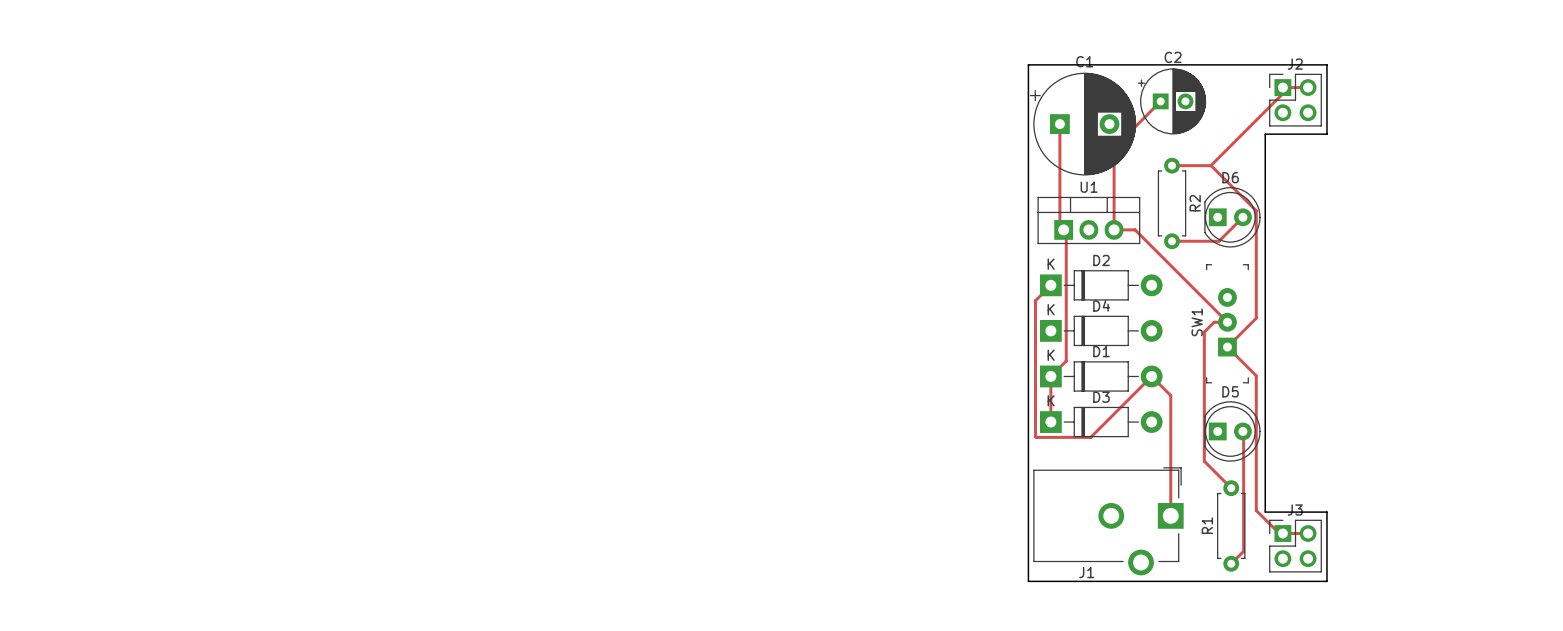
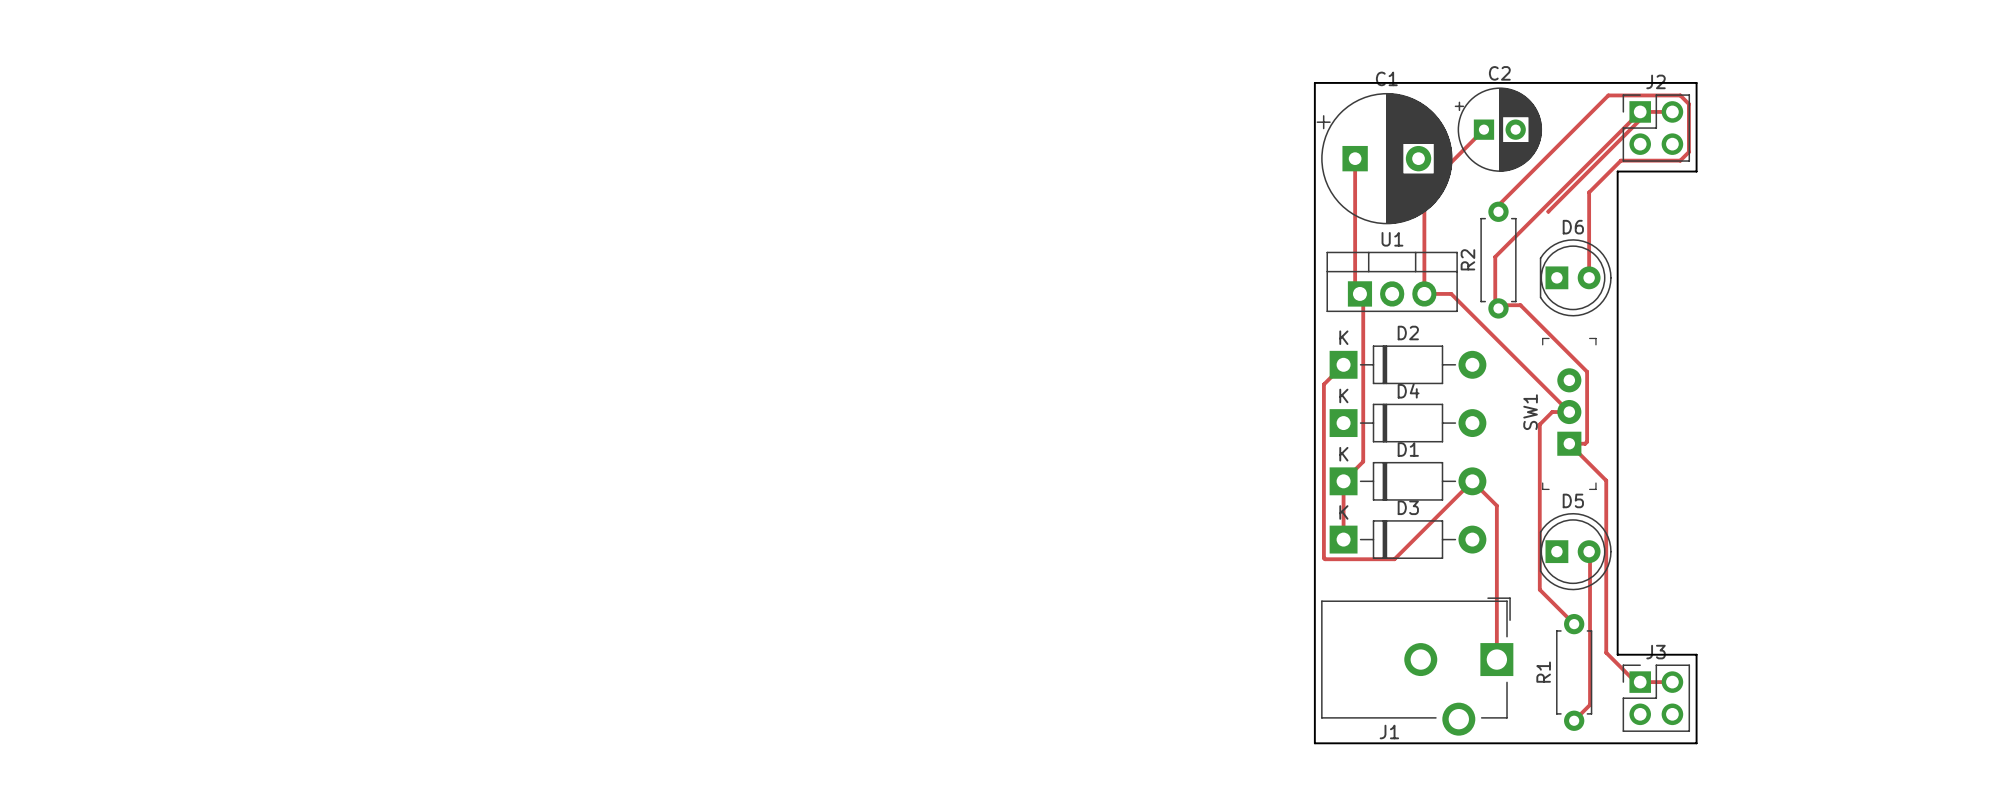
track: (1172, 165) (1211, 165) (1256, 210) (1256, 318) (1227, 347) -> (1640, 111) (1495, 256) (1495, 305) (1520, 305) (1587, 371) (1587, 441) (1585, 443) (1569, 443)
R2 name position: R2 (1195, 203) -> R2 (1467, 259)
track: (1242, 217) (1219, 241) (1172, 241) -> (1589, 277) (1589, 192) (1620, 160) (1680, 160) (1688, 152) (1688, 104) (1680, 95) (1608, 95) (1495, 208)

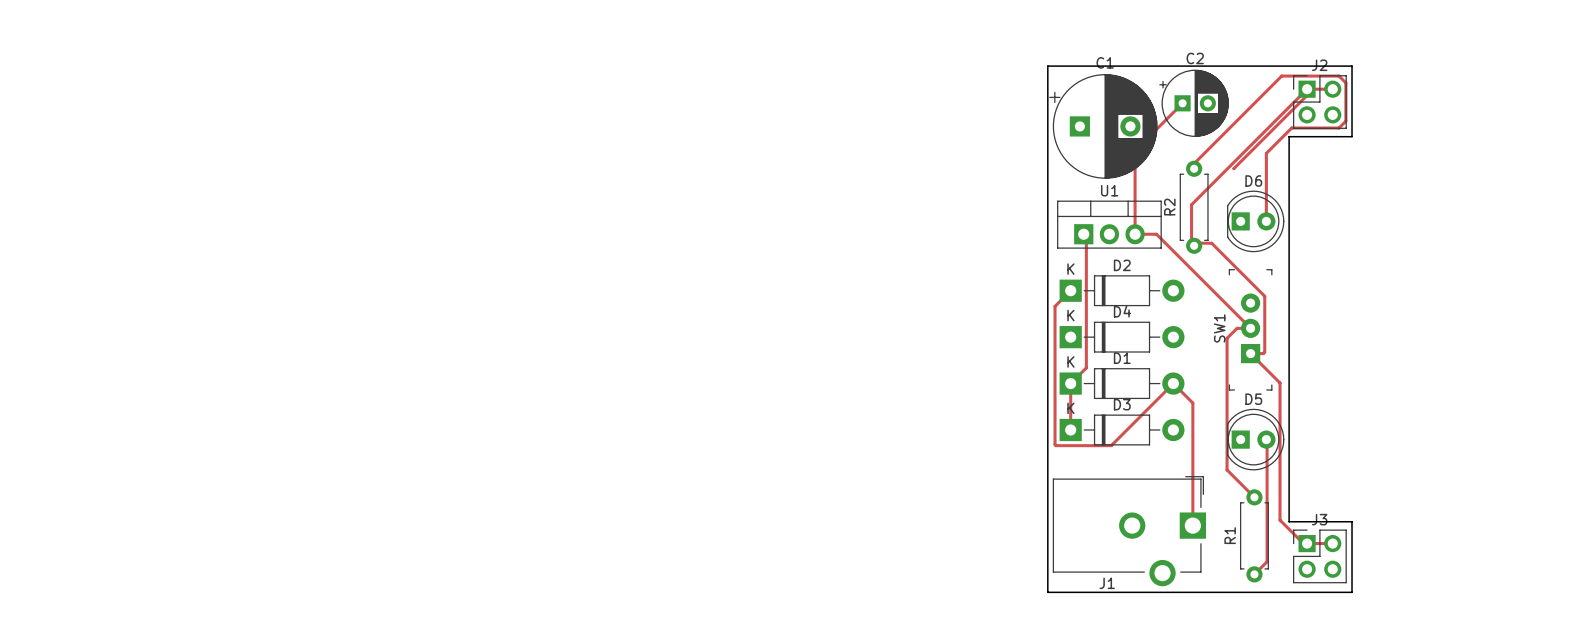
track: (1355, 158) (1355, 289) (1359, 293) -> none

